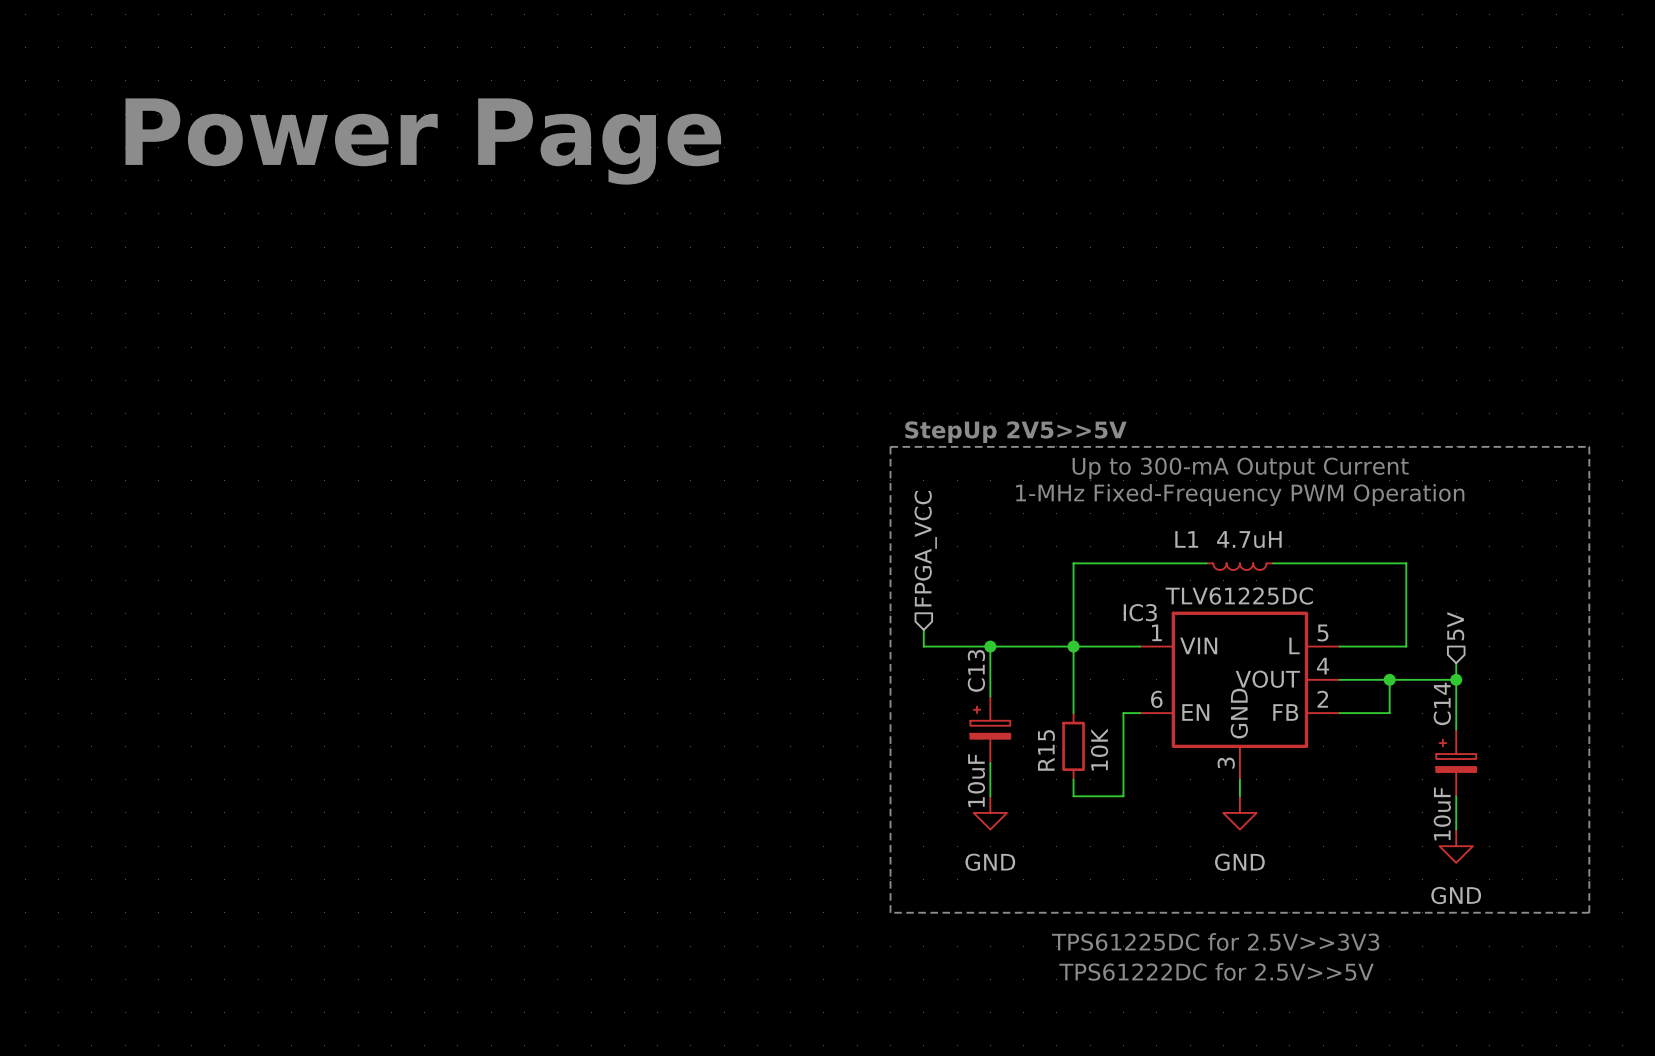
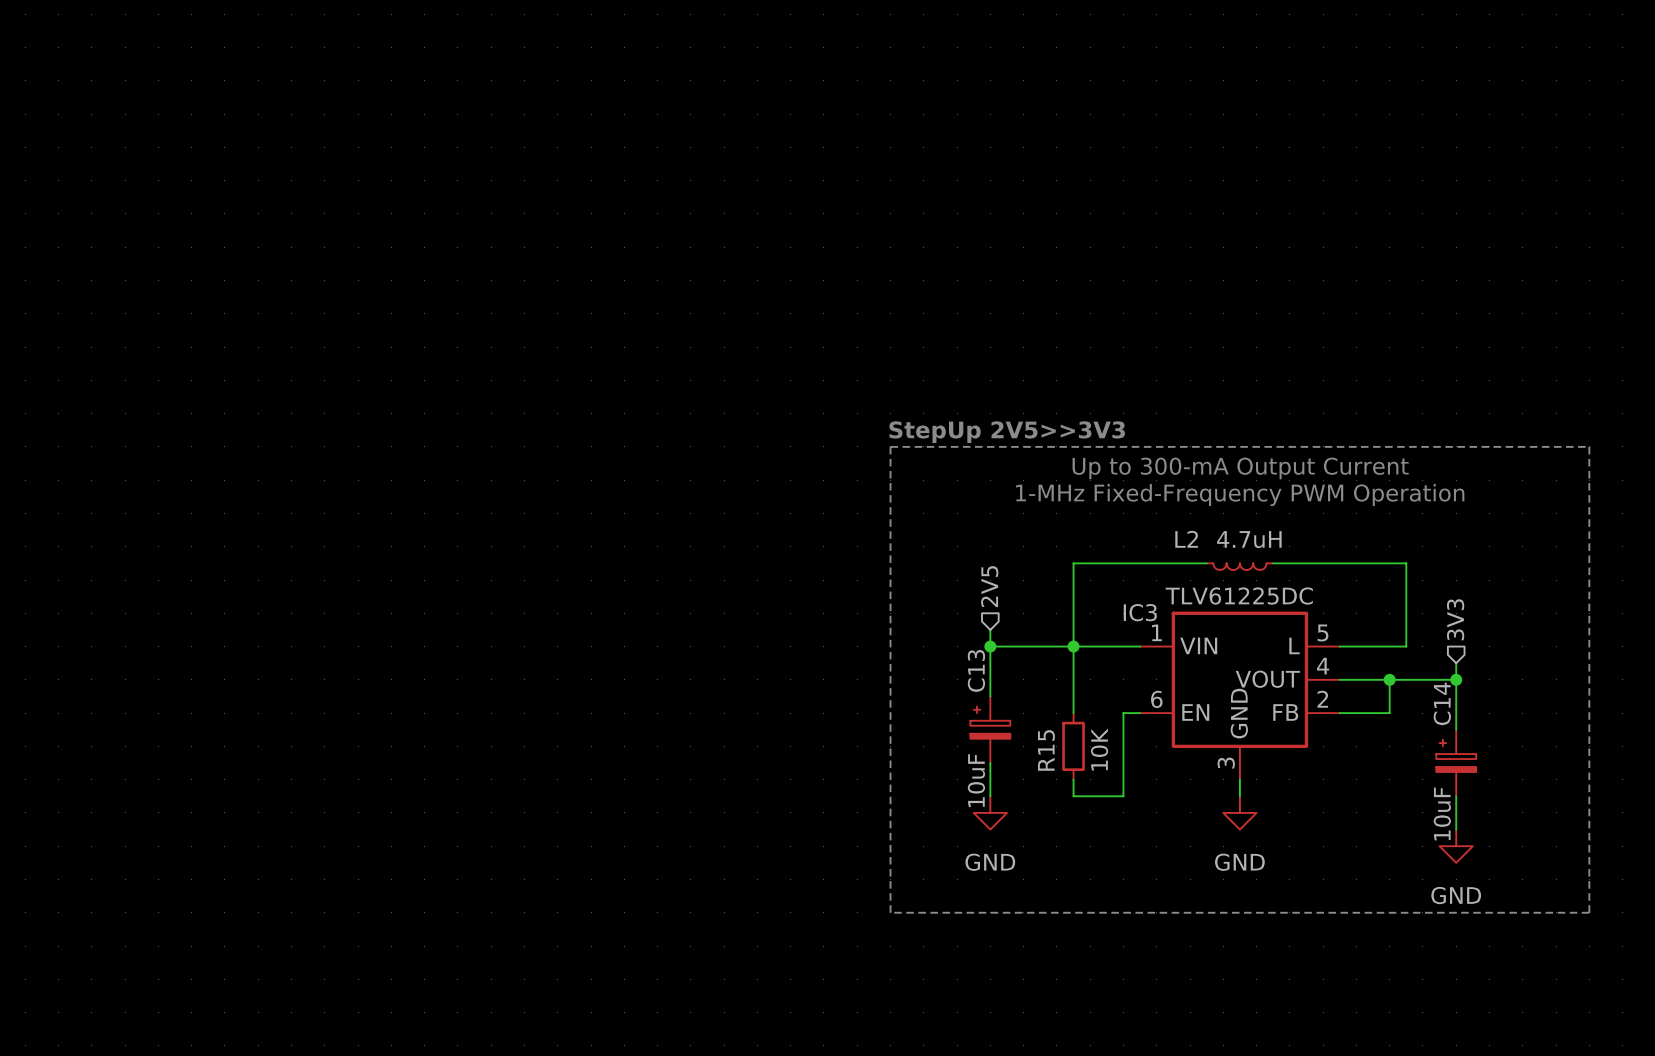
text: Power Page (423, 141) -> none
text: StepUp 2V5>>5V (1015, 432) -> StepUp 2V5>>3V3 (1007, 432)
L1 name: L1 (1186, 539) -> L2 (1186, 539)
hierarchical label: FPGA_VCC (925, 548) -> none
hierarchical label: none -> 2V5 (989, 586)
hierarchical label: 5V (1455, 626) -> 3V3 (1455, 619)
wire: (923, 629) (923, 646) (990, 646) -> (990, 629) (990, 646)
text: TPS61225DC for 2.5V>>3V3 (1215, 941) -> none
text: TPS61222DC for 2.5V>>5V (1216, 971) -> none

